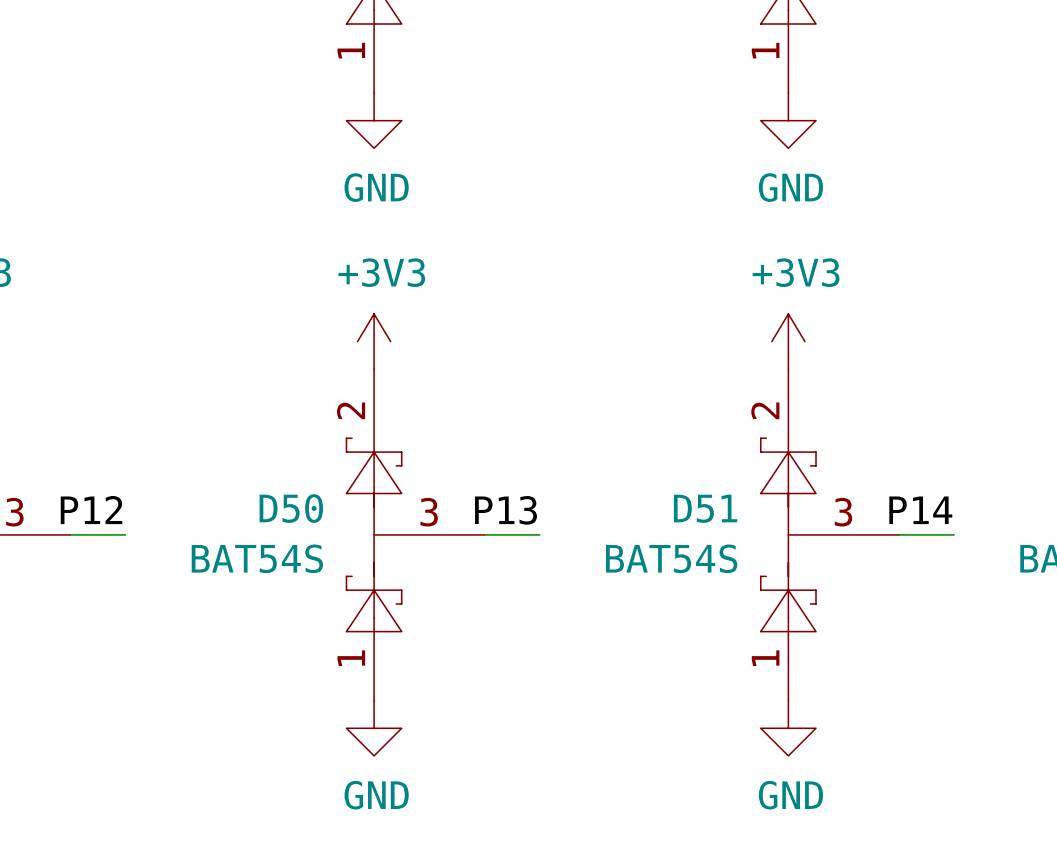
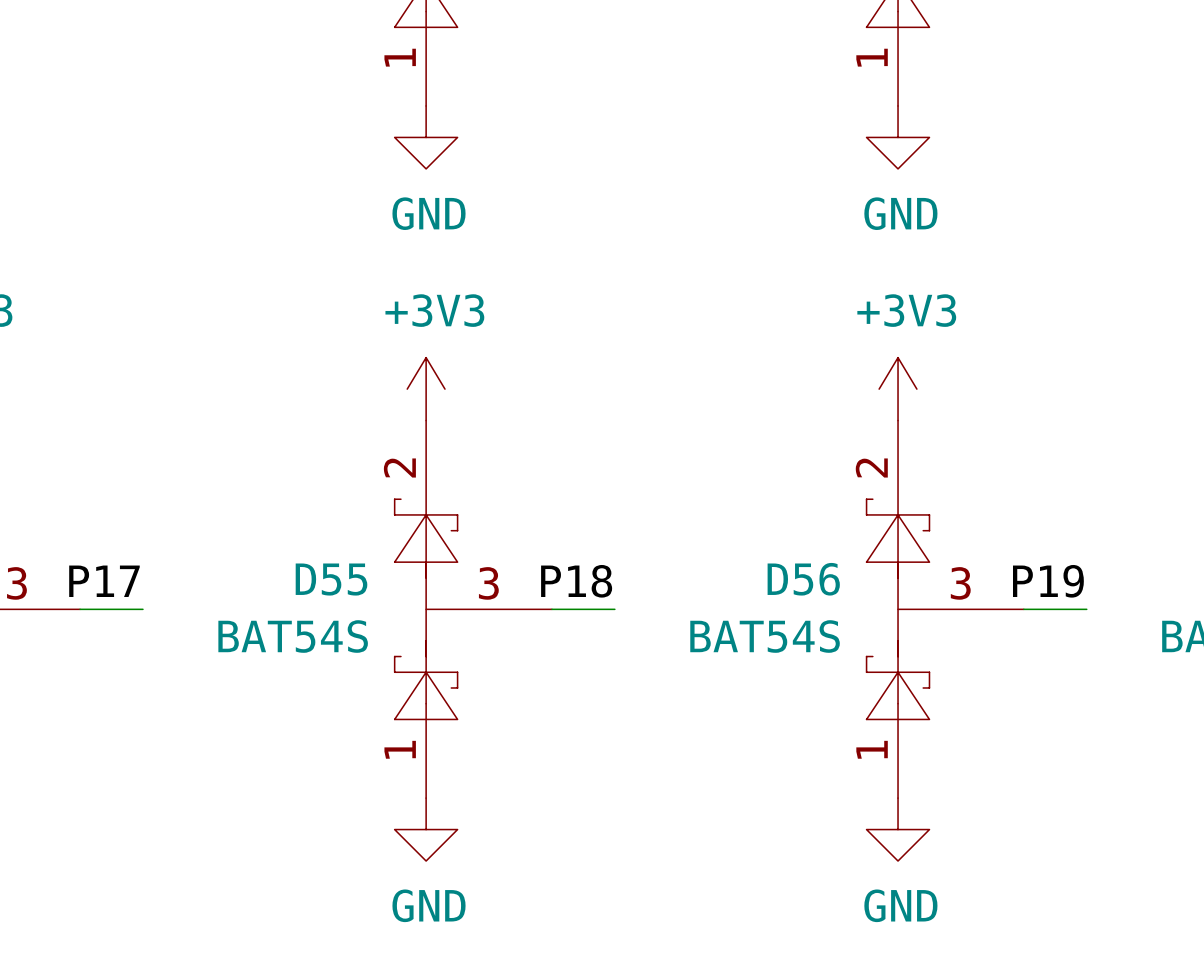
D50 name: D50 (291, 508) -> D55 (331, 579)
D51 name: D51 (705, 508) -> D56 (803, 579)
label: P12 (91, 510) -> P17 (104, 581)
label: P13 (505, 510) -> P18 (576, 581)
label: P14 (920, 510) -> P19 (1048, 581)

